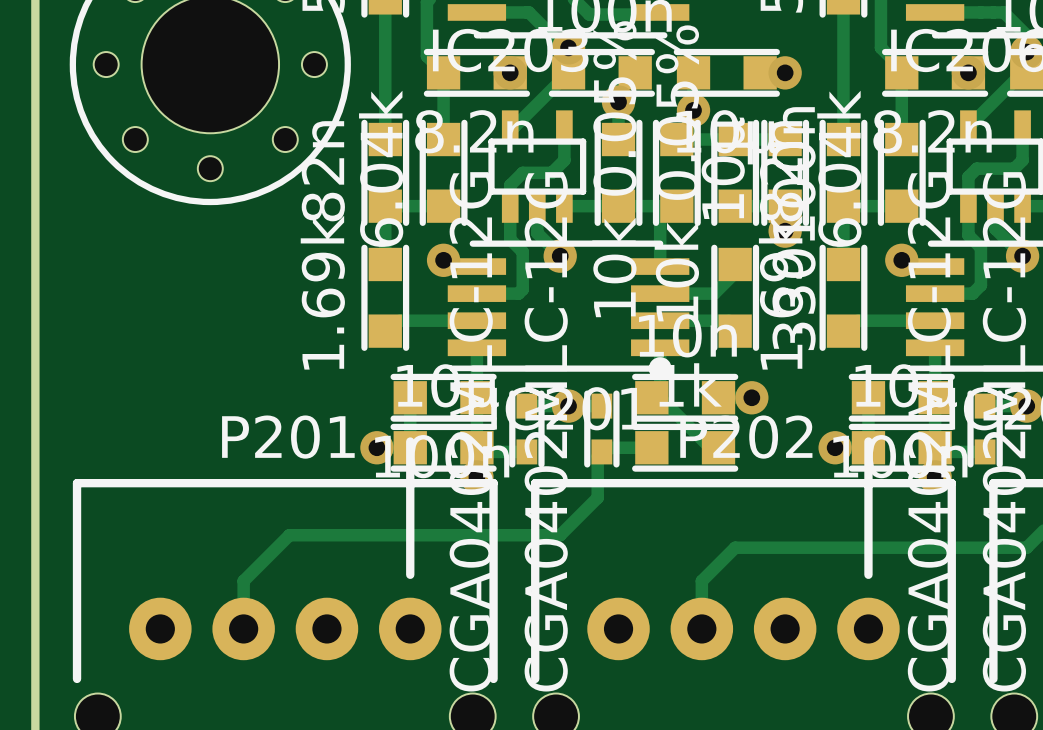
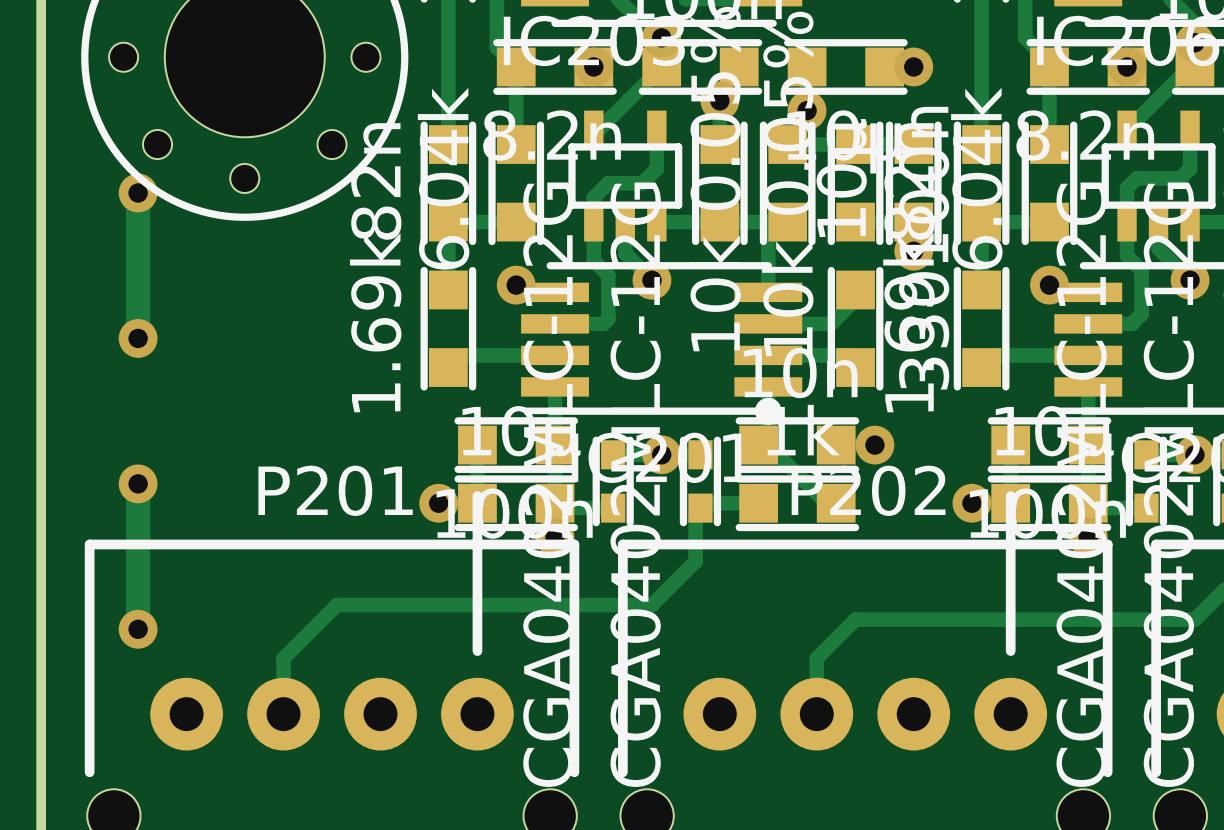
track: none -> (138, 193) (138, 338)
via: none -> (138, 193)
via: none -> (138, 338)
track: none -> (138, 483) (138, 629)
via: none -> (138, 483)
via: none -> (138, 629)

